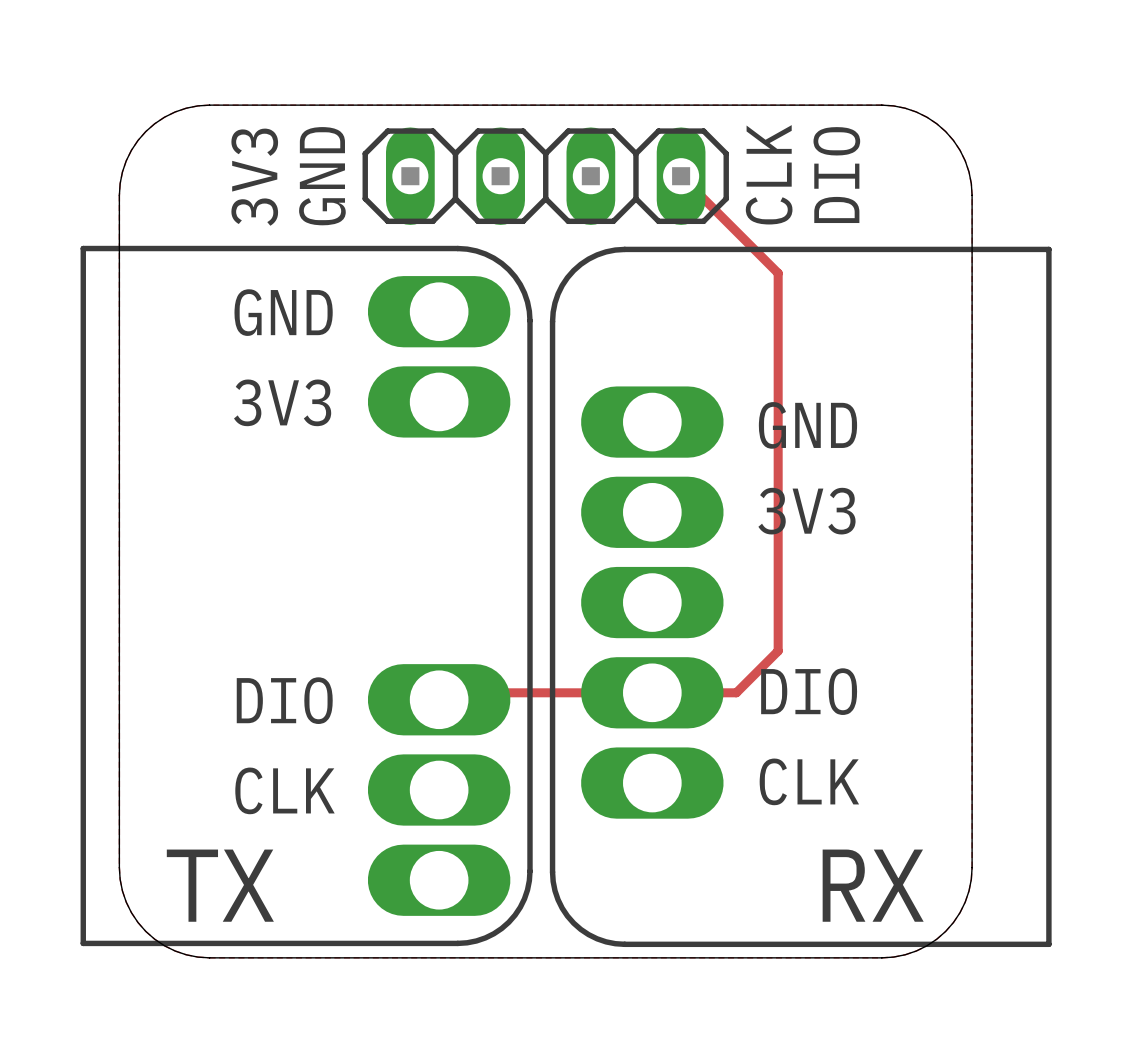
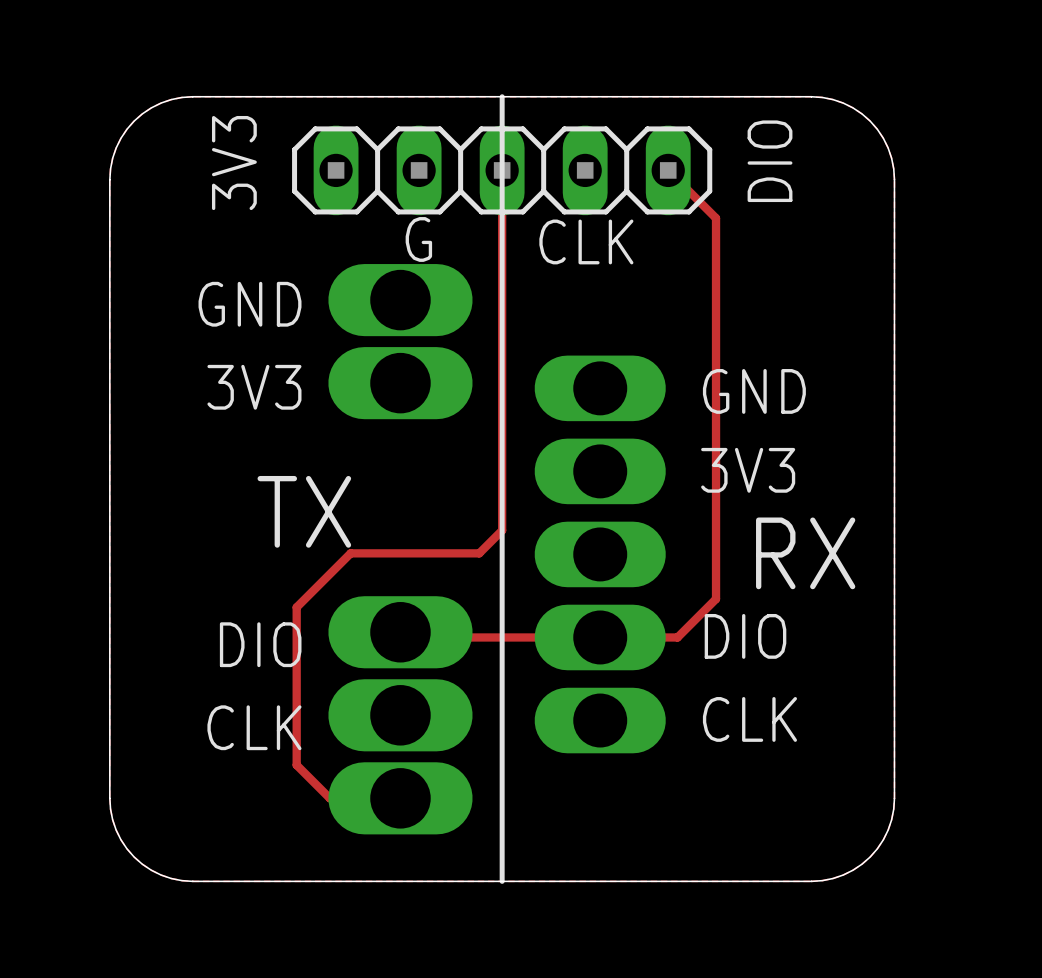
line: none -> (502, 96) (502, 881)
part footprint: [362, 127, 729, 225] -> [292, 125, 713, 216]
text rotation: 0° (769, 174) -> 90° clockwise (586, 241)
text position: CLK (769, 174) -> CLK (586, 241)
text: GND (322, 176) -> none
track: (681, 176) (778, 273) -> (668, 170) (716, 218) (716, 251)
track: none -> (502, 170) (502, 530) (479, 553) (350, 553) (296, 607) (296, 765) (329, 798) (400, 798)
line: (83, 248) (467, 249) (493, 258) (508, 269) (520, 284) (527, 302) (529, 320) (529, 871) (527, 889) (520, 907) (508, 922) (493, 933) (476, 940) (457, 943) (83, 943) (83, 248) -> none
line: (624, 249) (1048, 249) (1048, 944) (615, 943) (588, 934) (573, 923) (562, 908) (555, 890) (552, 872) (553, 312) (562, 285) (580, 264) (606, 251) (624, 249) -> none
text: none -> G (418, 239)
part footprint: [367, 276, 511, 438] -> [328, 264, 473, 420]
text position: GND (283, 312) -> GND (250, 304)
text position: 3V3 (282, 402) -> 3V3 (254, 387)
part footprint: [367, 664, 511, 916] -> [328, 596, 473, 835]
text position: TX (220, 885) -> TX (304, 511)
text position: RX (873, 885) -> RX (805, 553)

